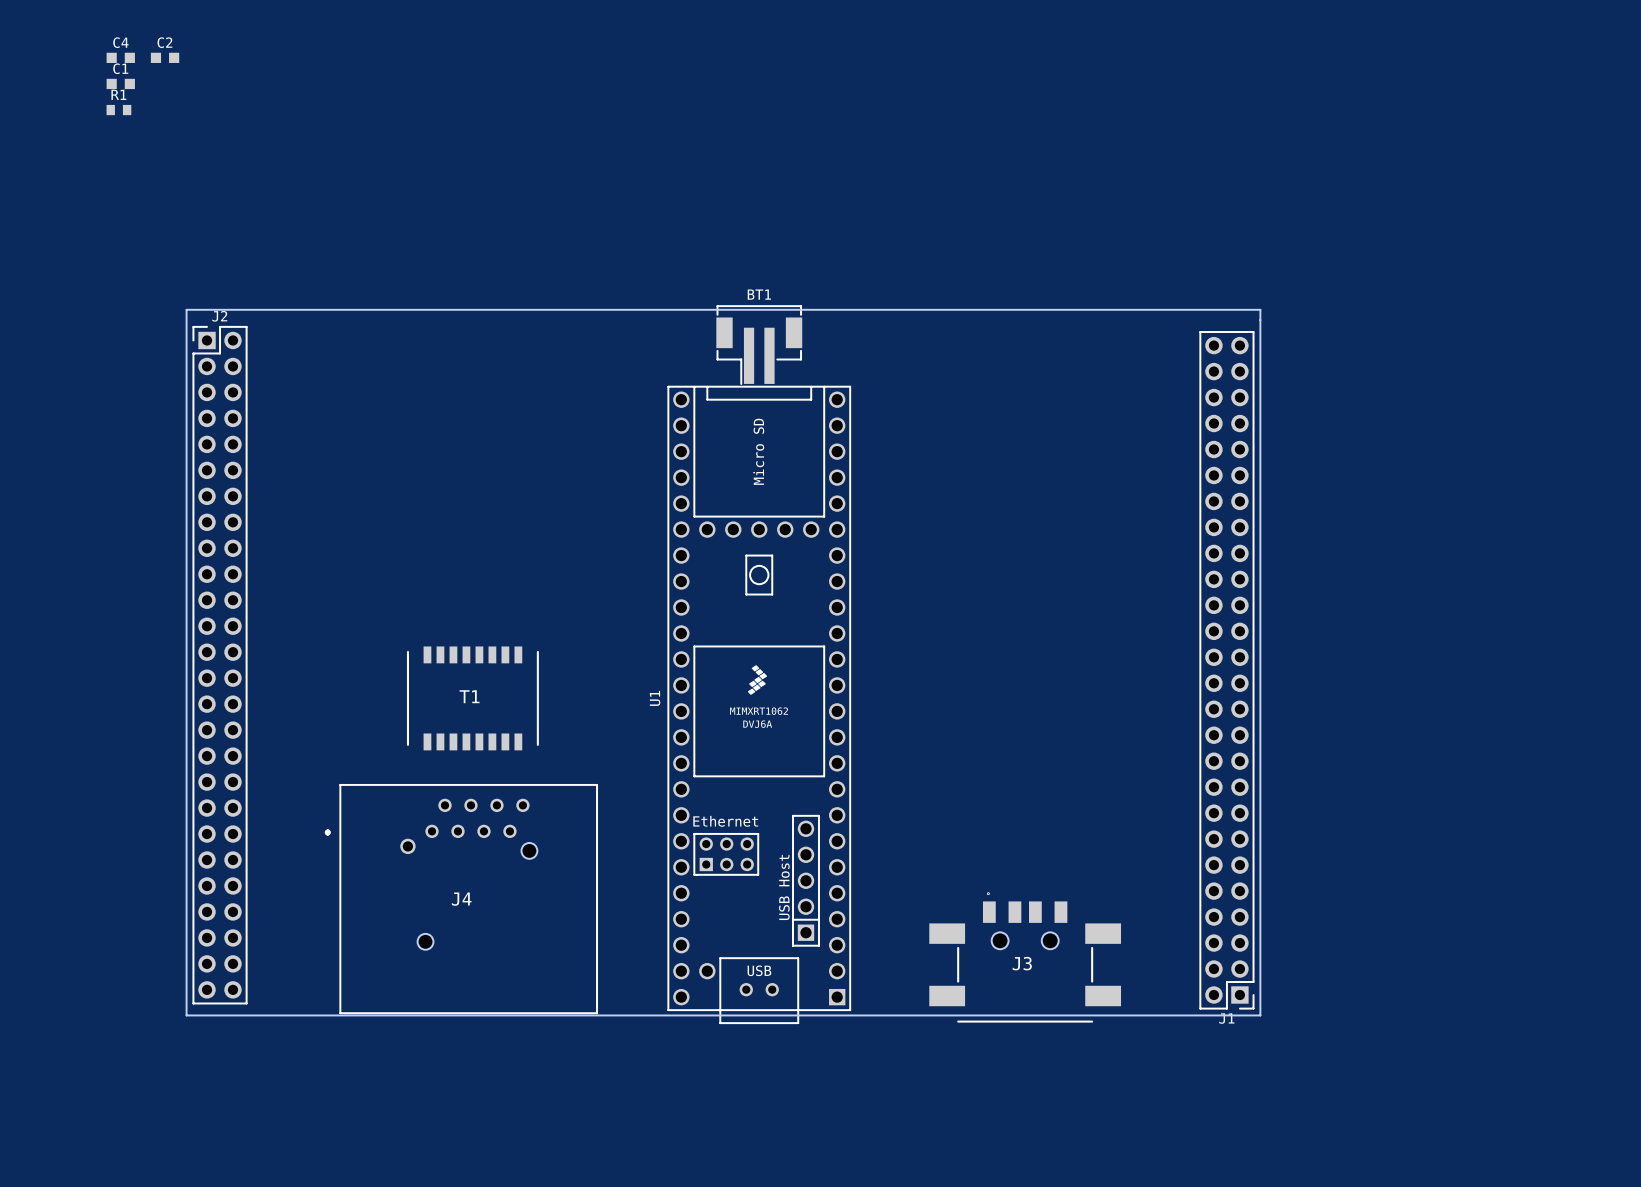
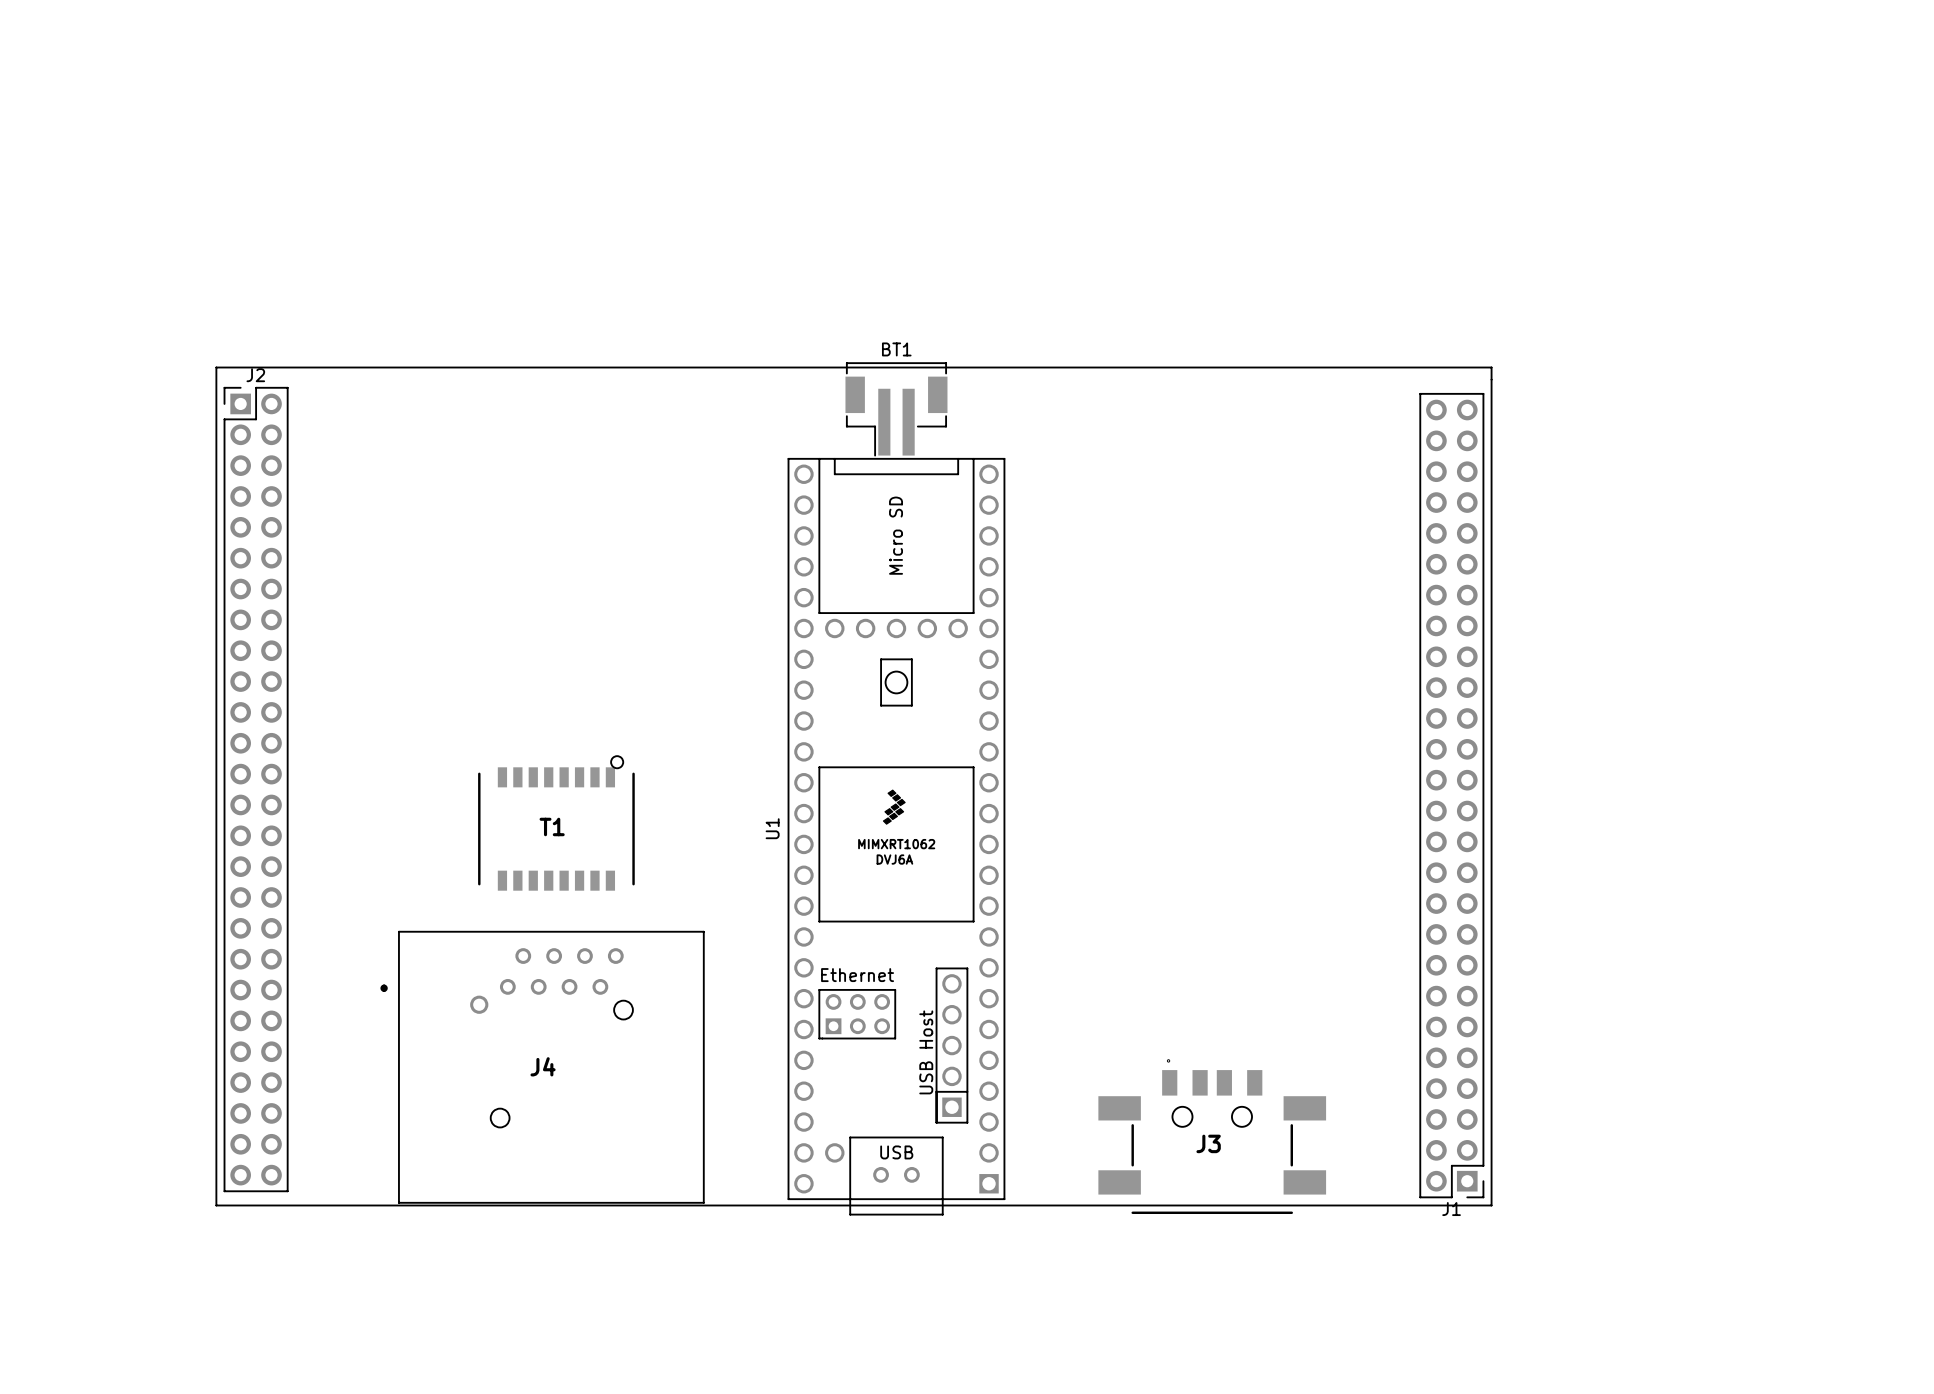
C4: (120, 57) -> none
C2: (165, 57) -> none
C1: (120, 83) -> none
R1: (118, 110) -> none
drawing: none -> [610, 755, 624, 770]

